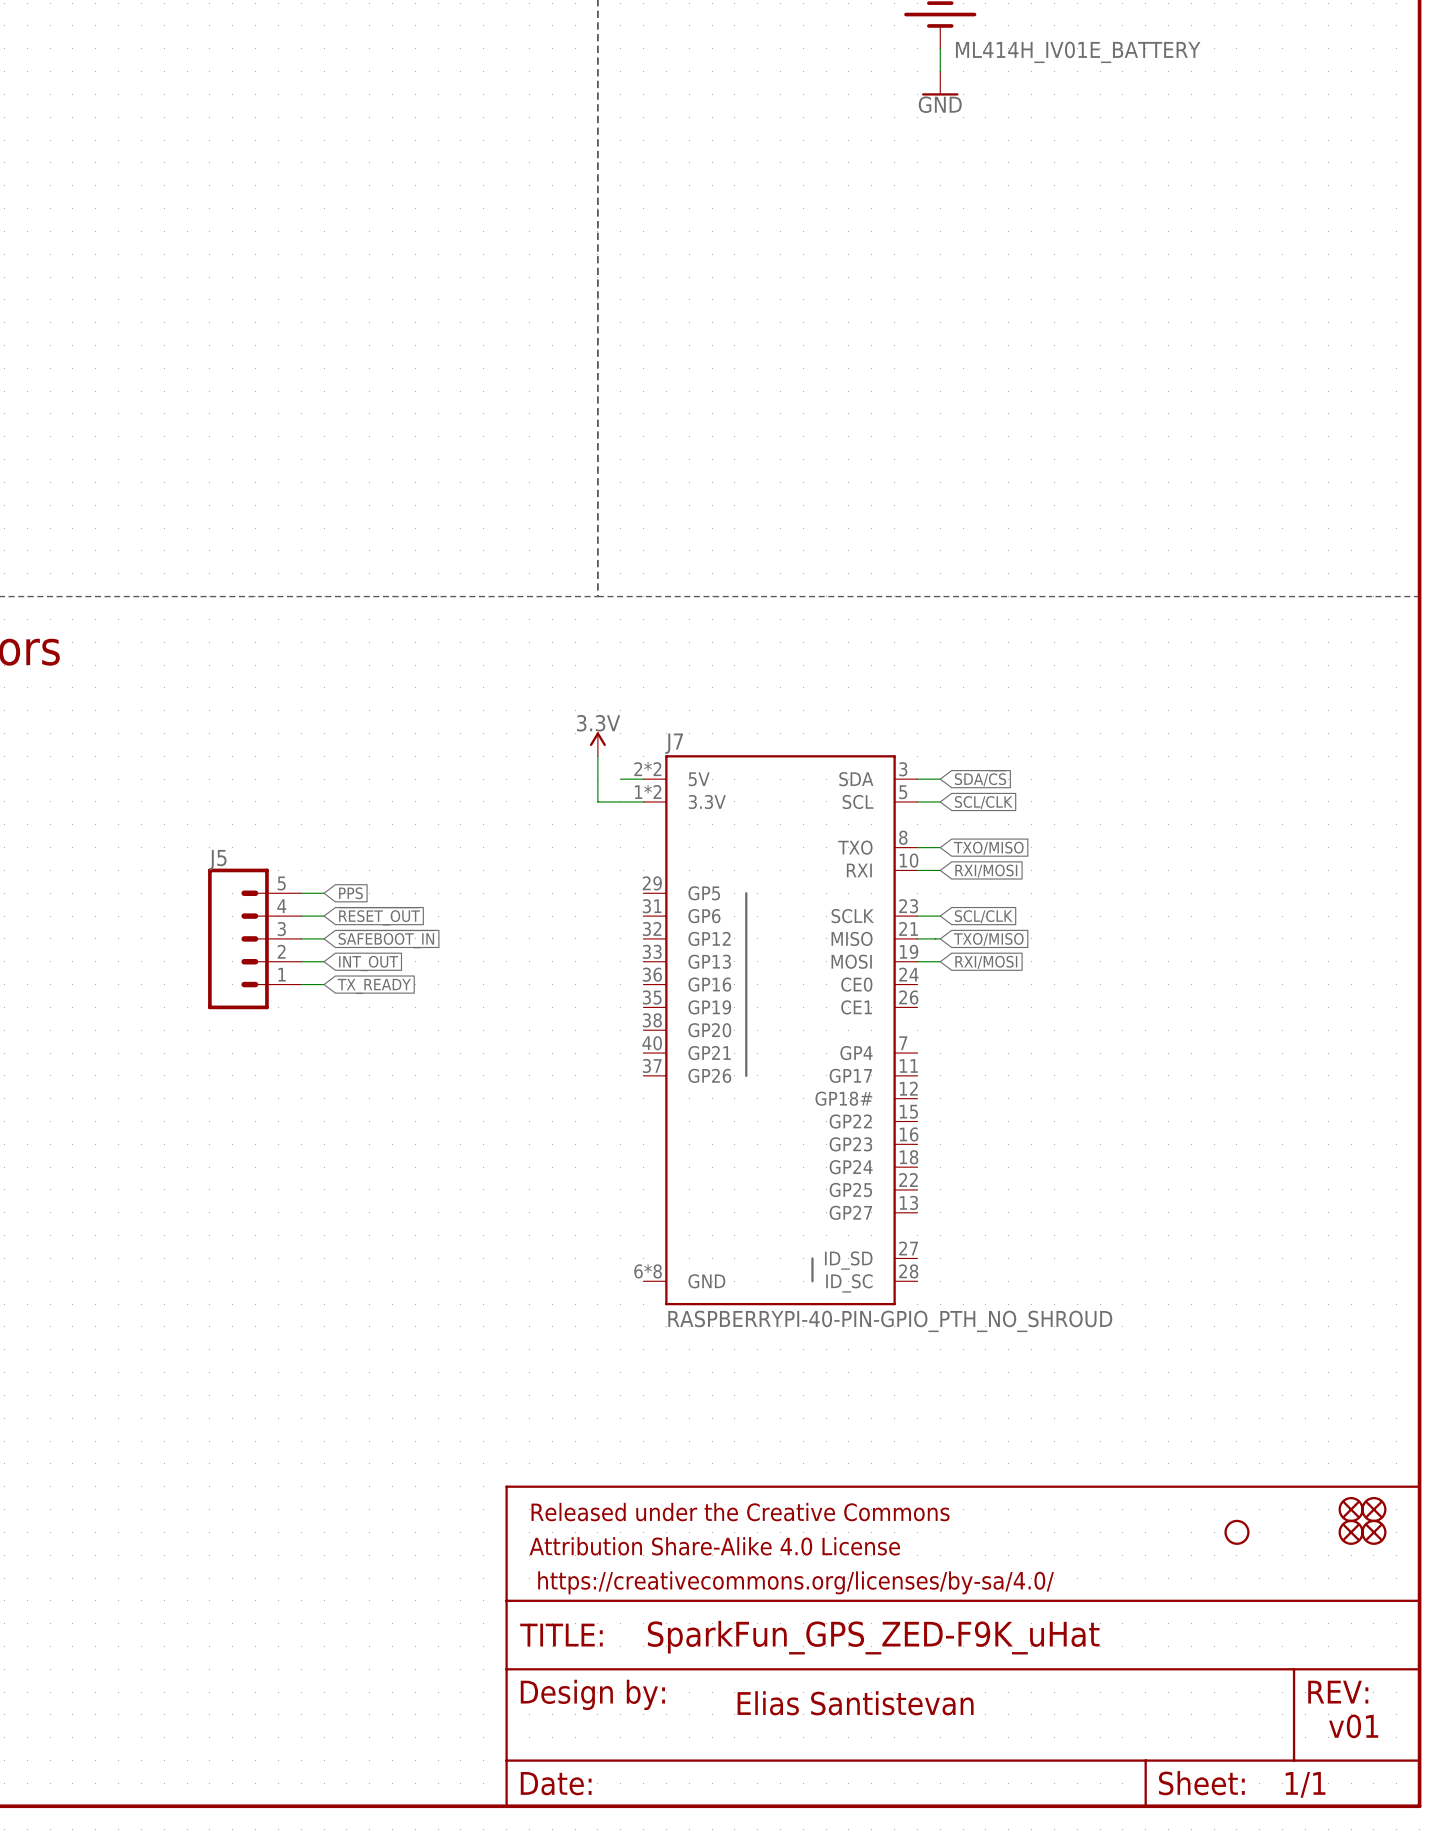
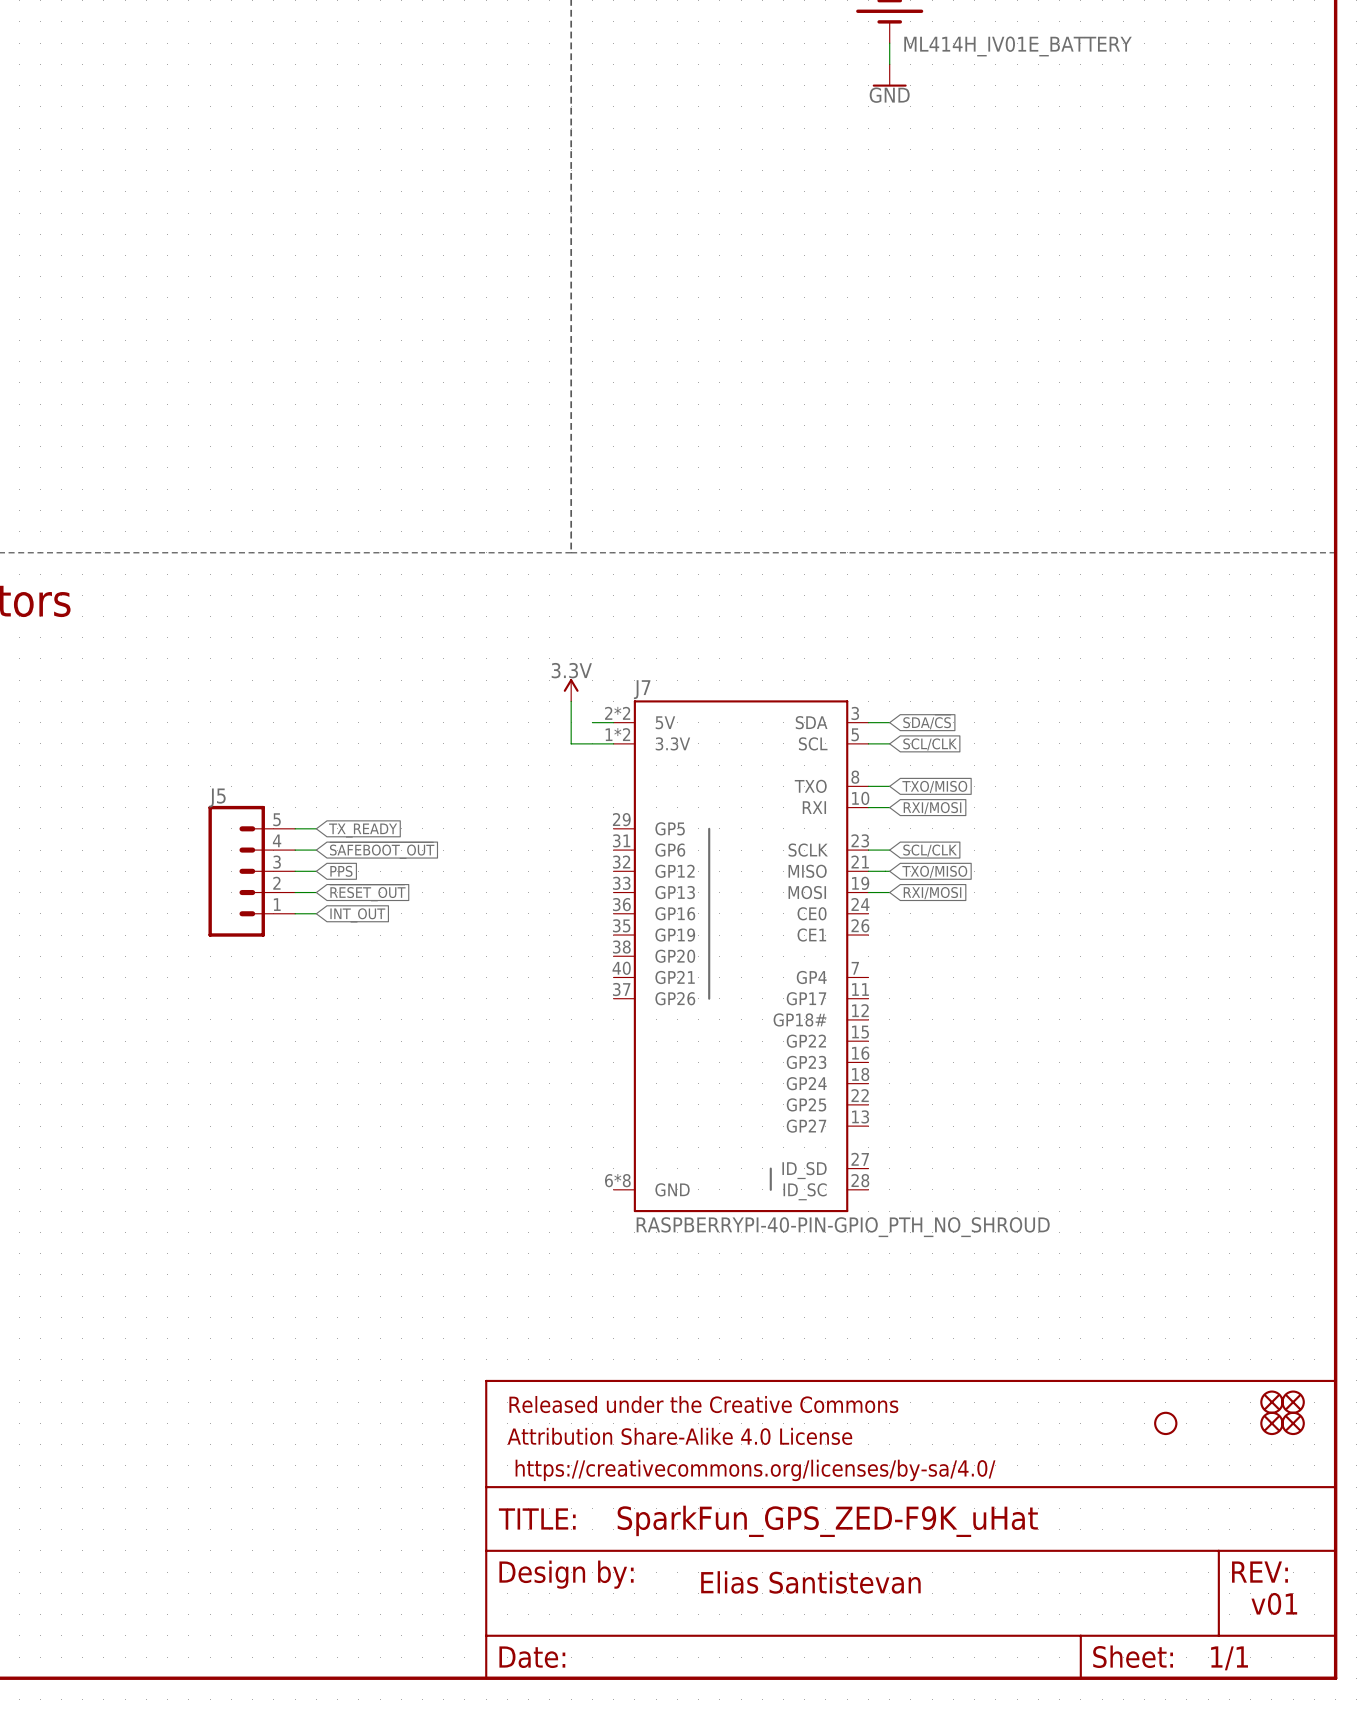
global label: PPS (350, 893) -> TX_READY (363, 830)
global label: ~{RESET_OUT} (379, 916) -> ~{SAFEBOOT_OUT} (382, 850)
global label: ~{SAFEBOOT_IN} (386, 939) -> PPS (341, 871)
global label: INT_OUT (368, 963) -> ~{RESET_OUT} (367, 893)
global label: TX_READY (374, 986) -> INT_OUT (357, 915)

